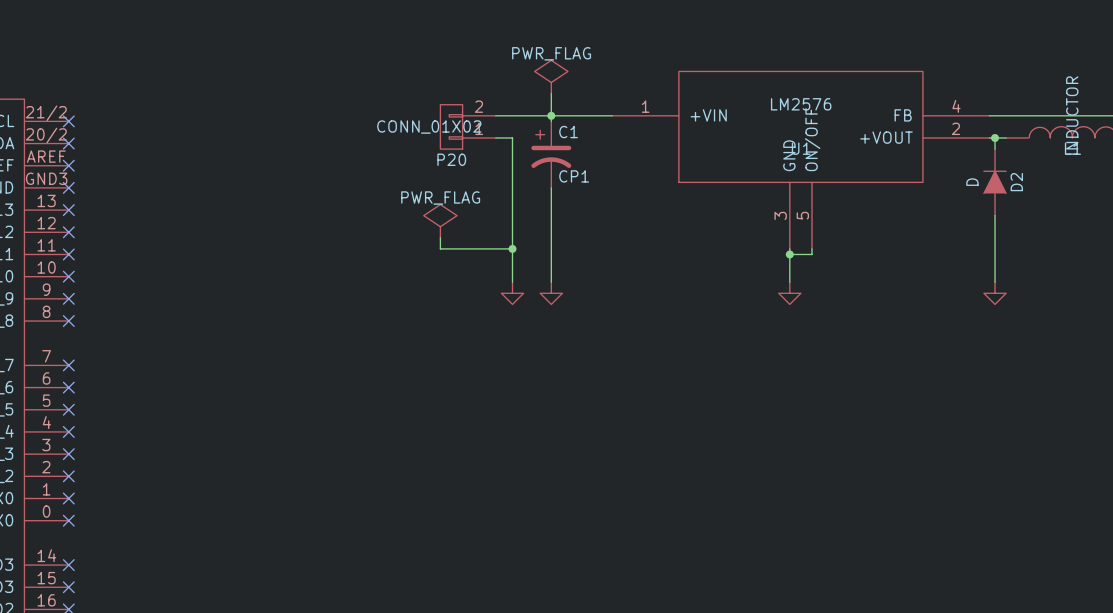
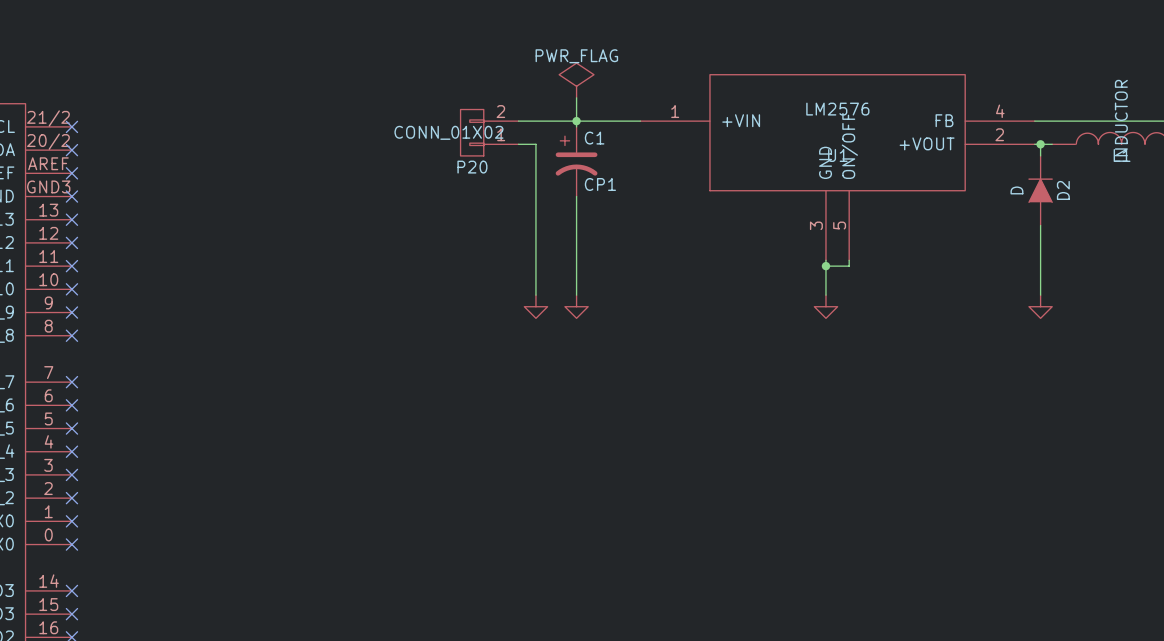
power symbol: PWR_FLAG (440, 221) -> none
wire: (440, 237) (440, 248) (512, 248) -> none
junction: (512, 248) -> none

